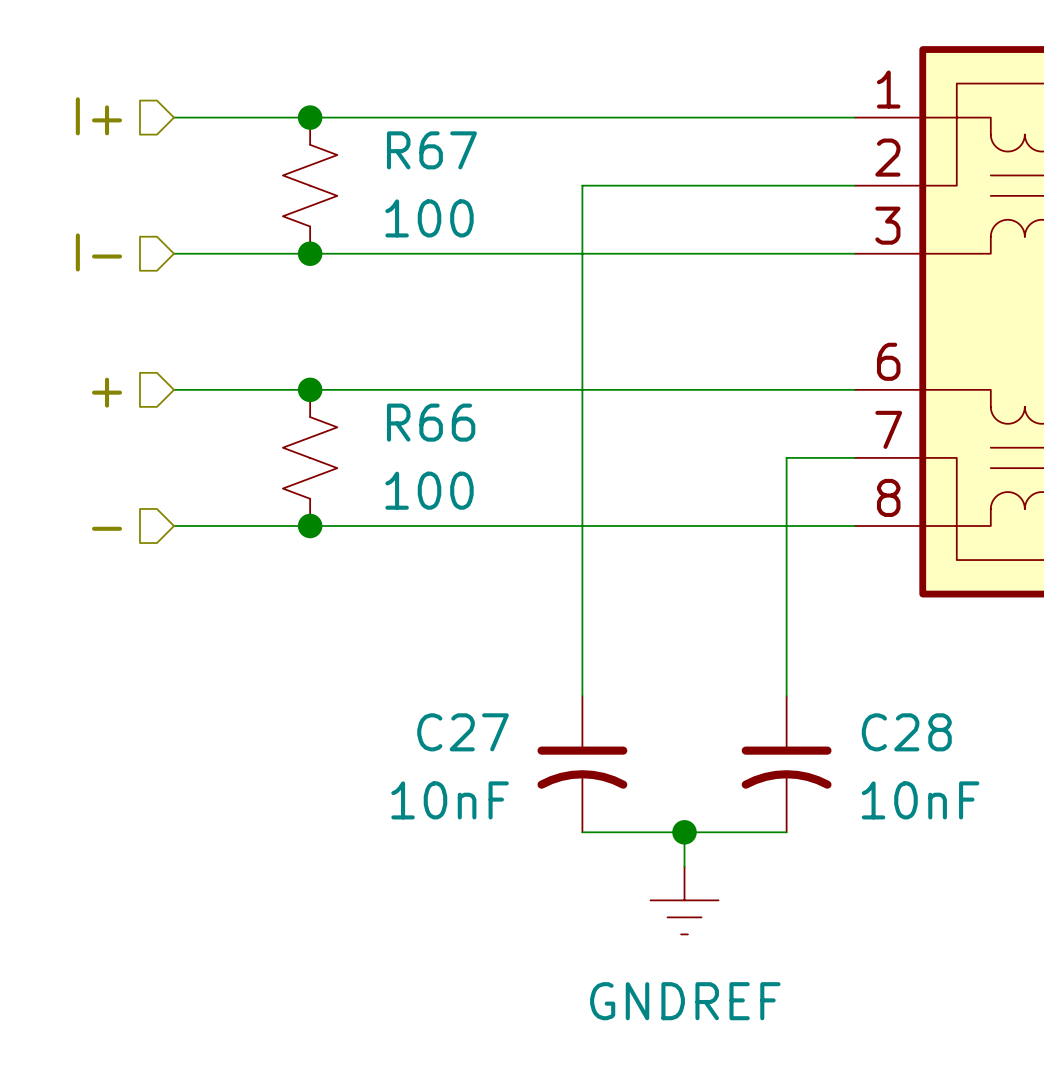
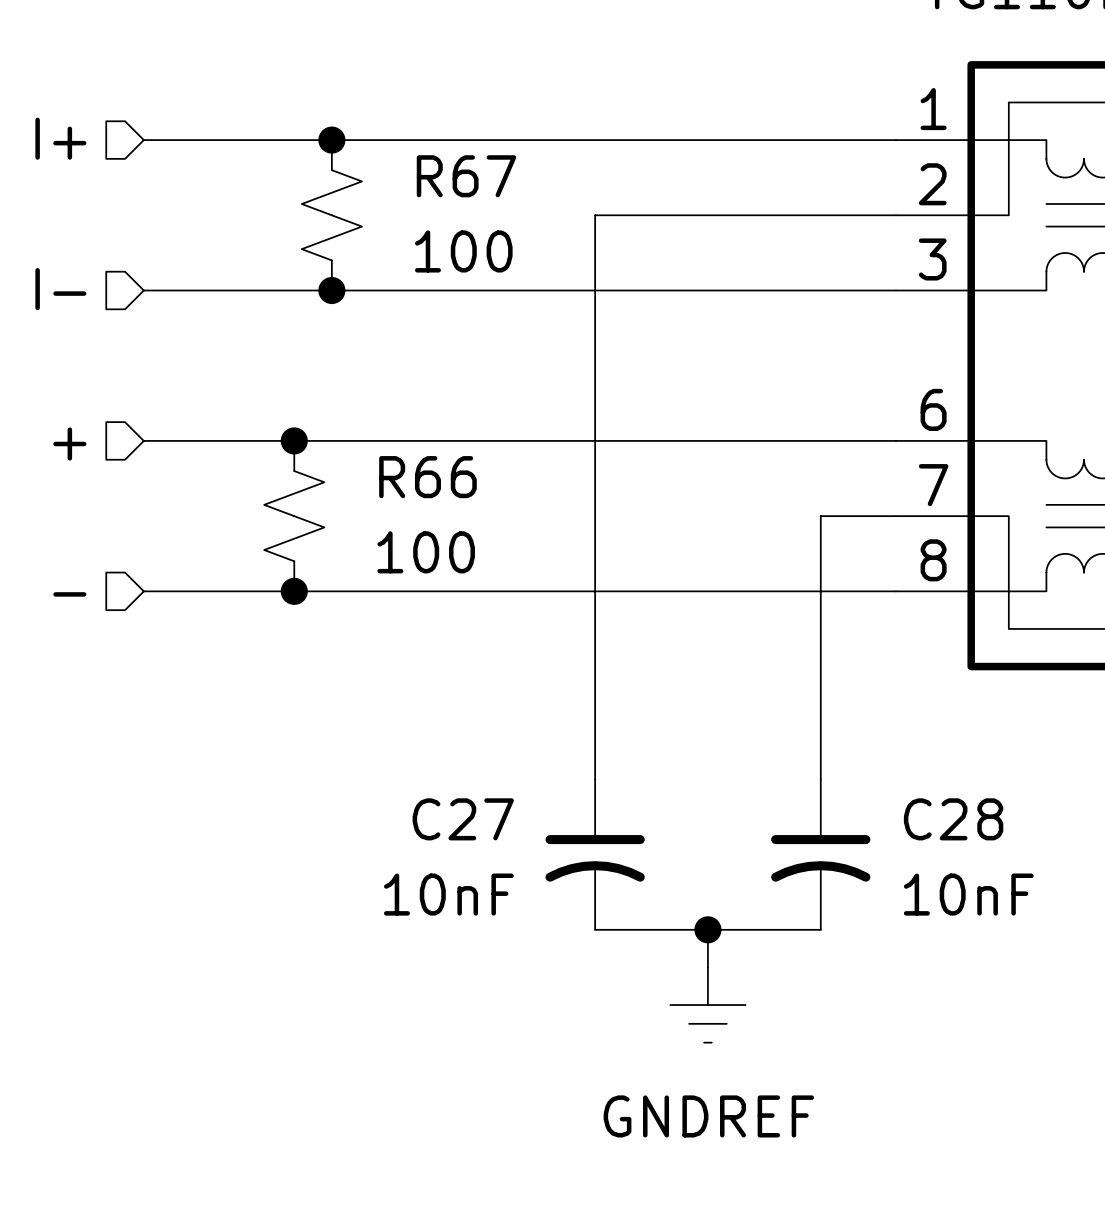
junction position: (310, 117) -> (331, 140)
R67 position: (310, 185) -> (331, 215)
junction position: (310, 253) -> (331, 290)

